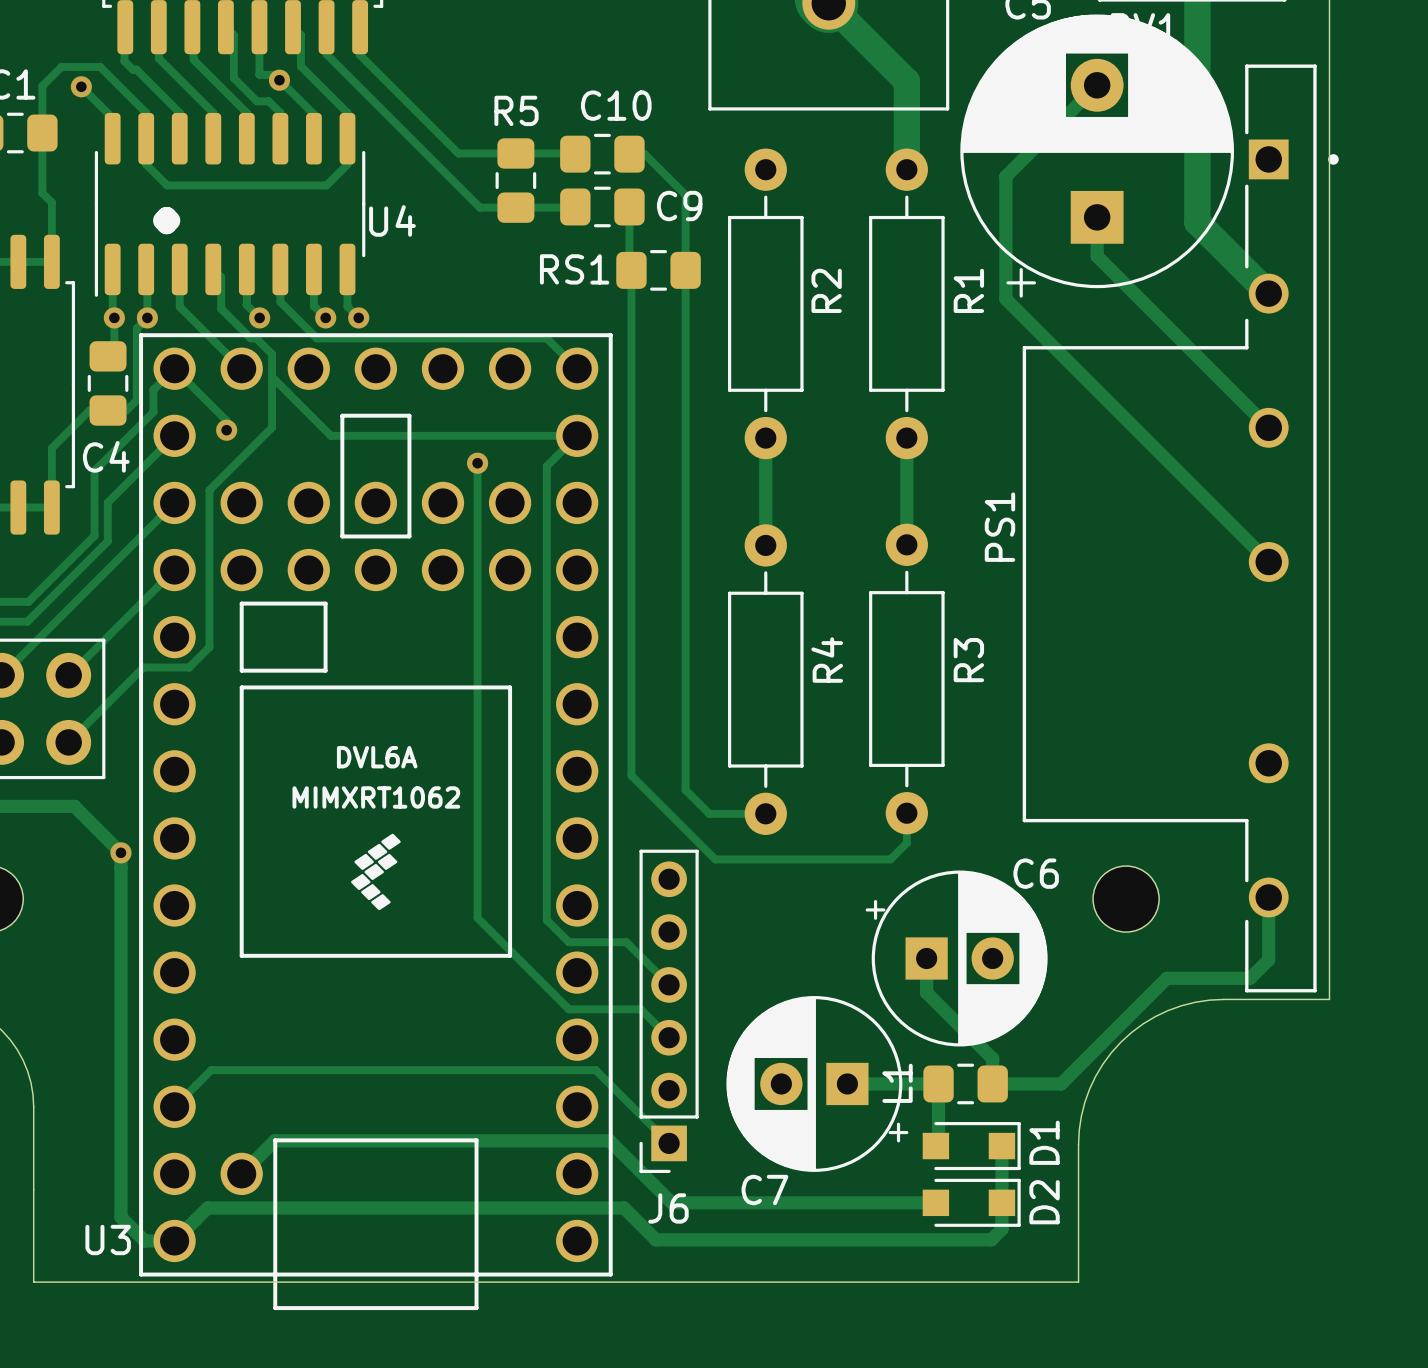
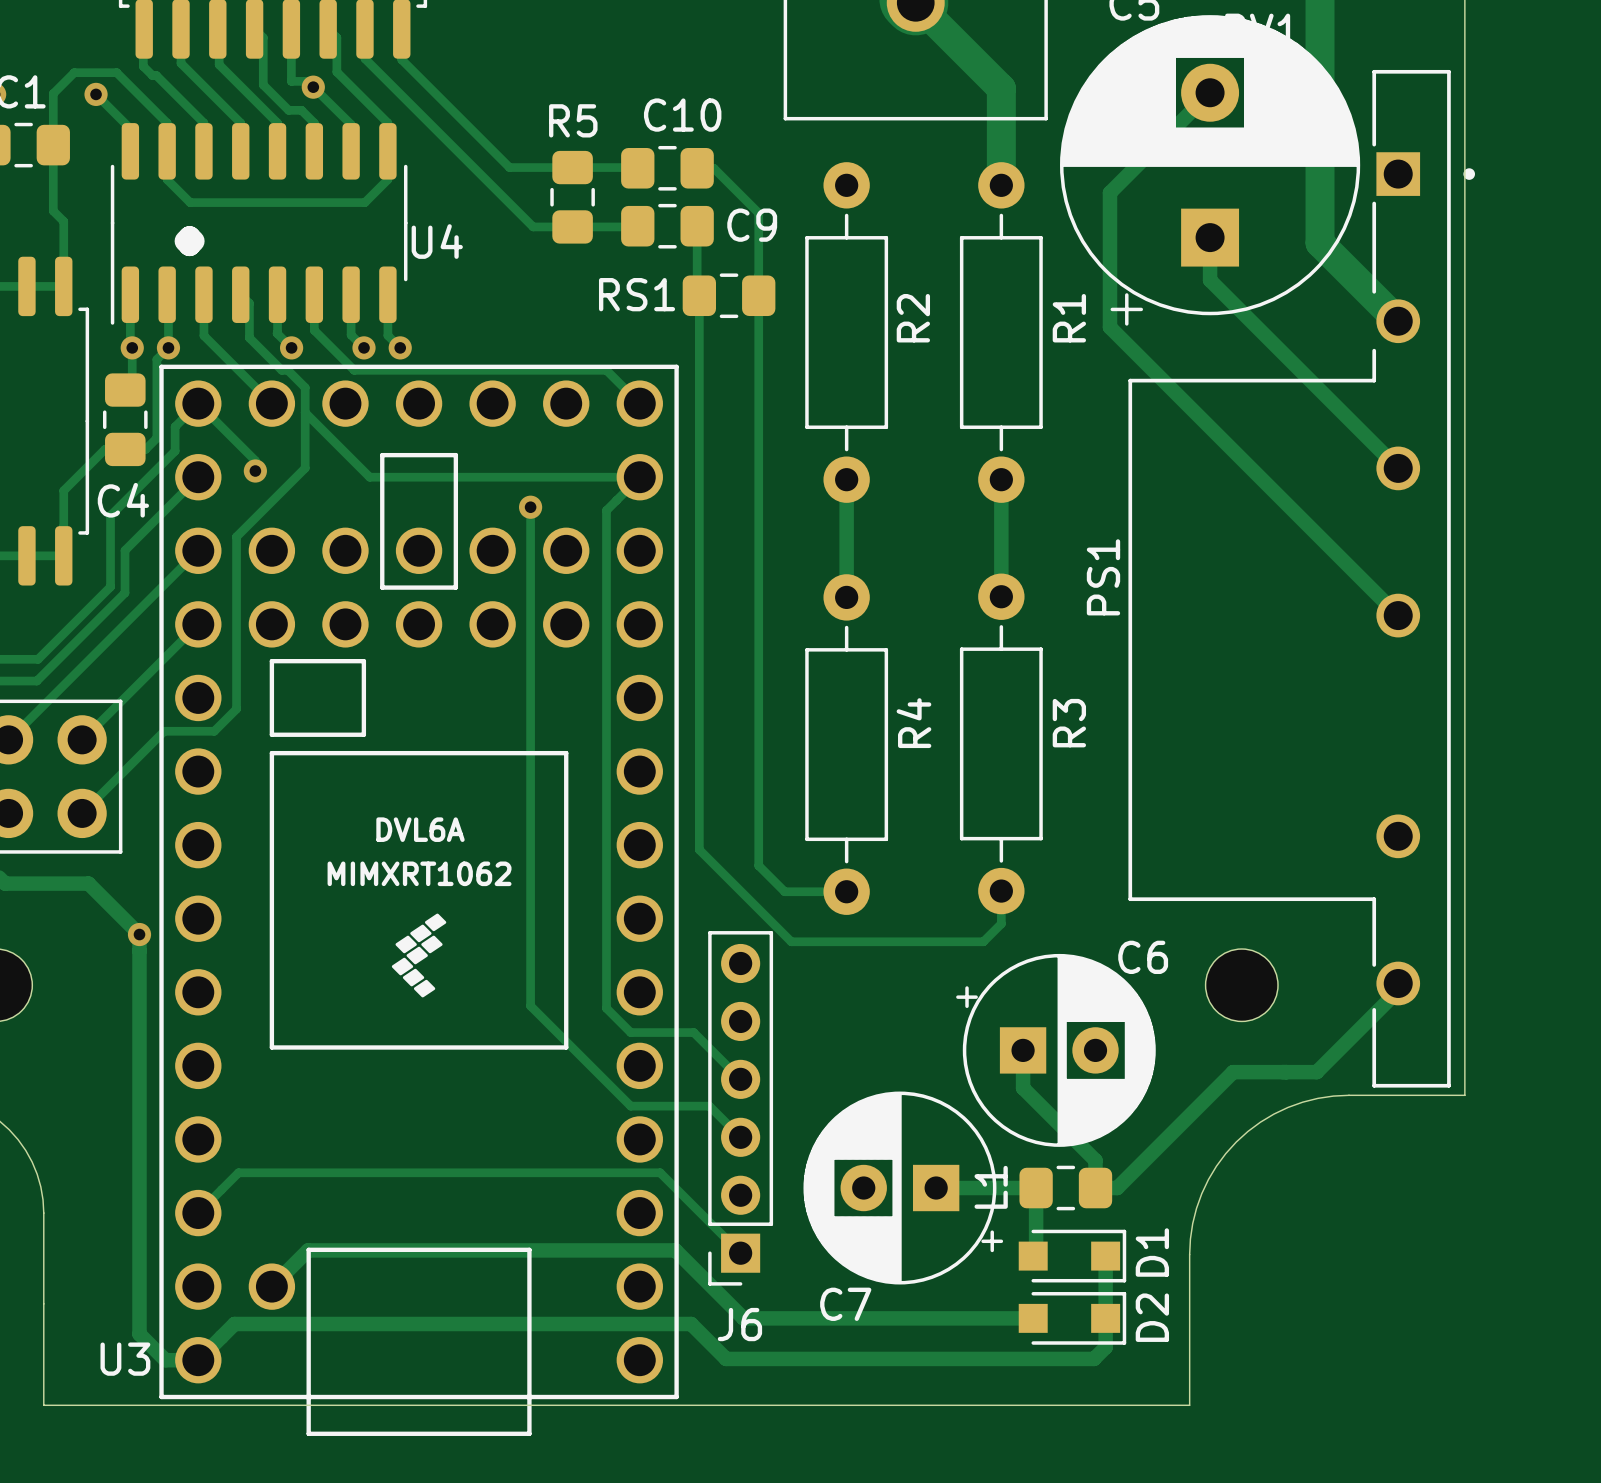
track: (1268, 903) (1268, 959) (1250, 978) (1194, 978) -> (1398, 990) (1316, 1072)
track: (1166, 978) (1061, 1083) (1012, 1083) -> (1286, 1072) (1233, 1072) (1117, 1188)

